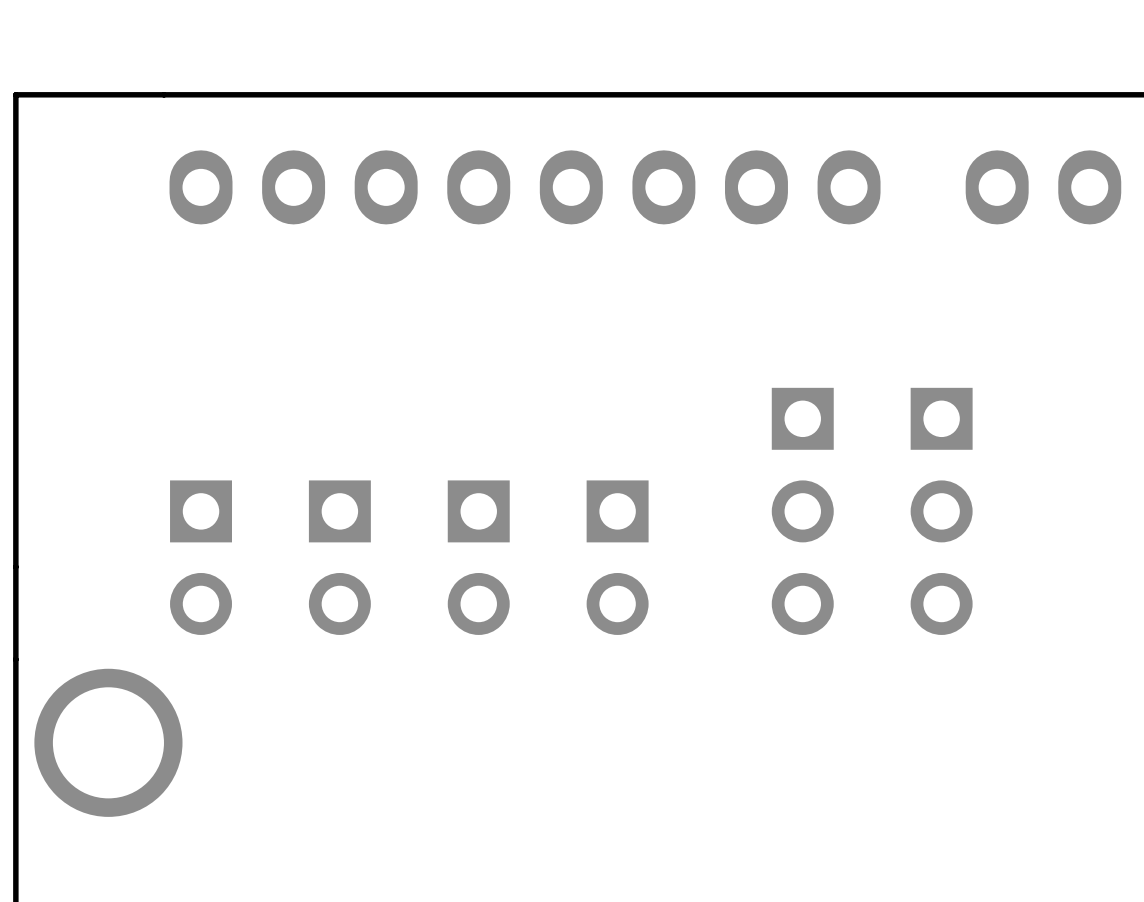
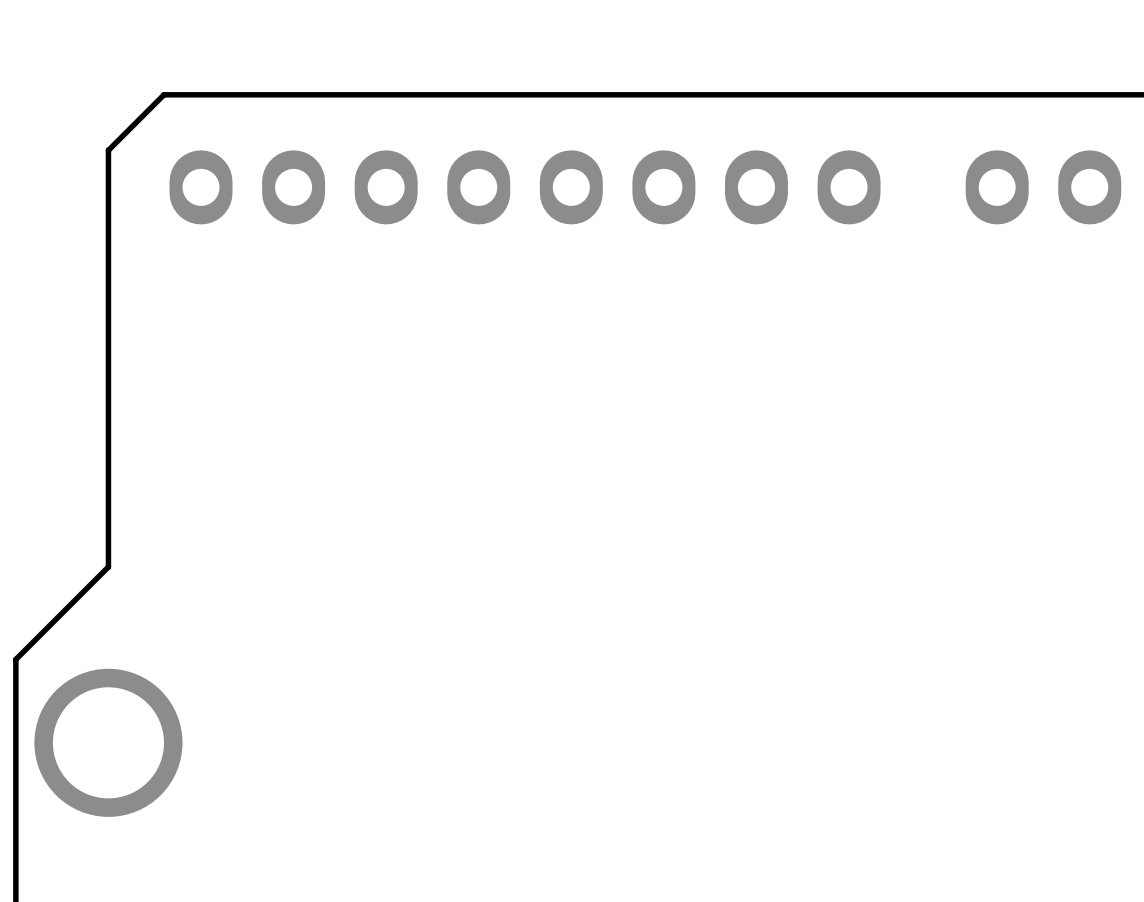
board edge: (163, 94) (15, 94) (15, 659) -> (163, 94) (108, 150) (108, 566) (15, 659)
part: (802, 511) -> none
part: (941, 511) -> none
part: (201, 557) -> none
part: (339, 557) -> none
part: (478, 557) -> none
part: (617, 557) -> none

